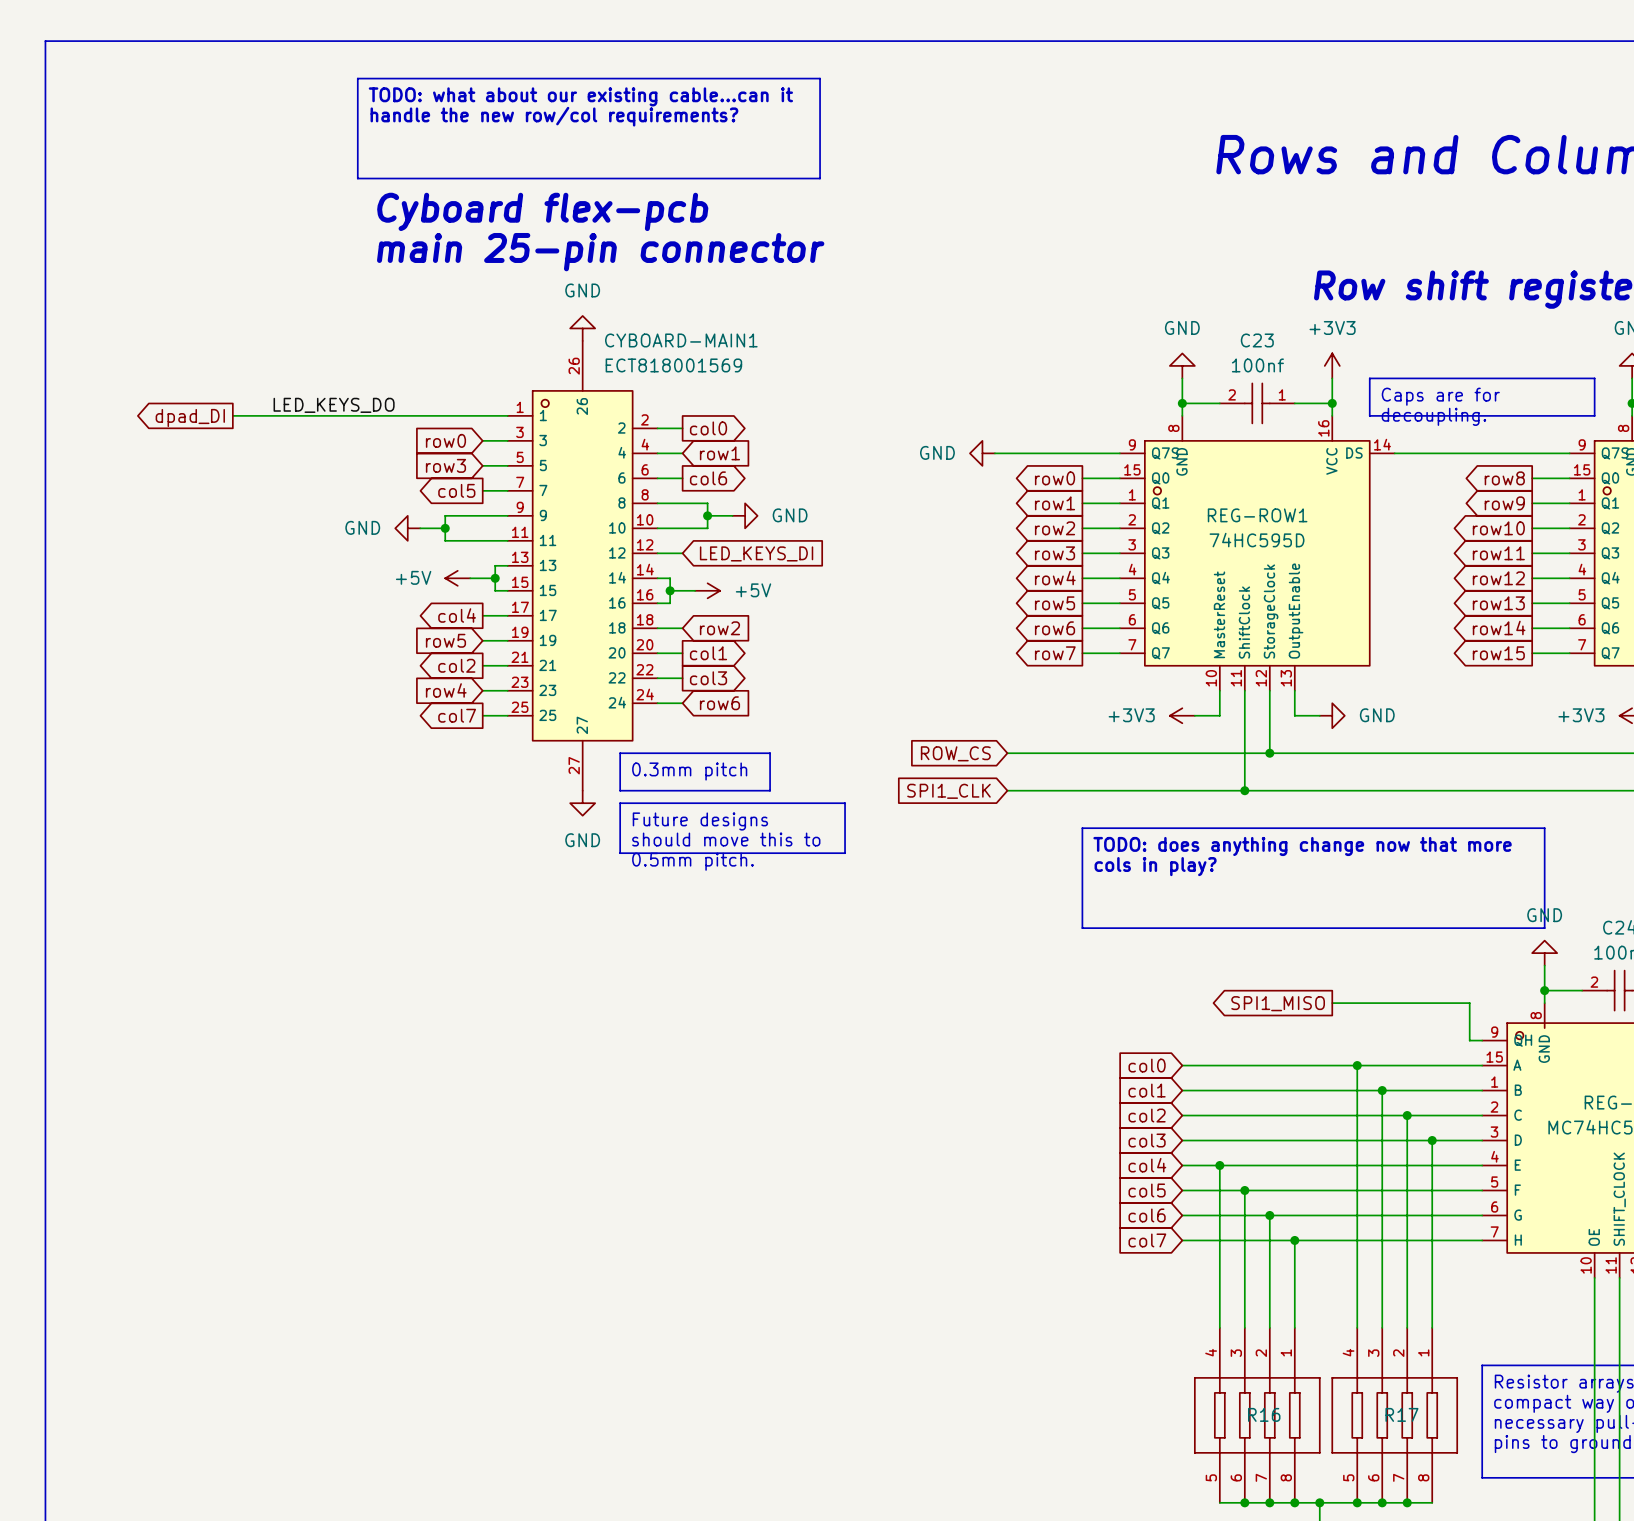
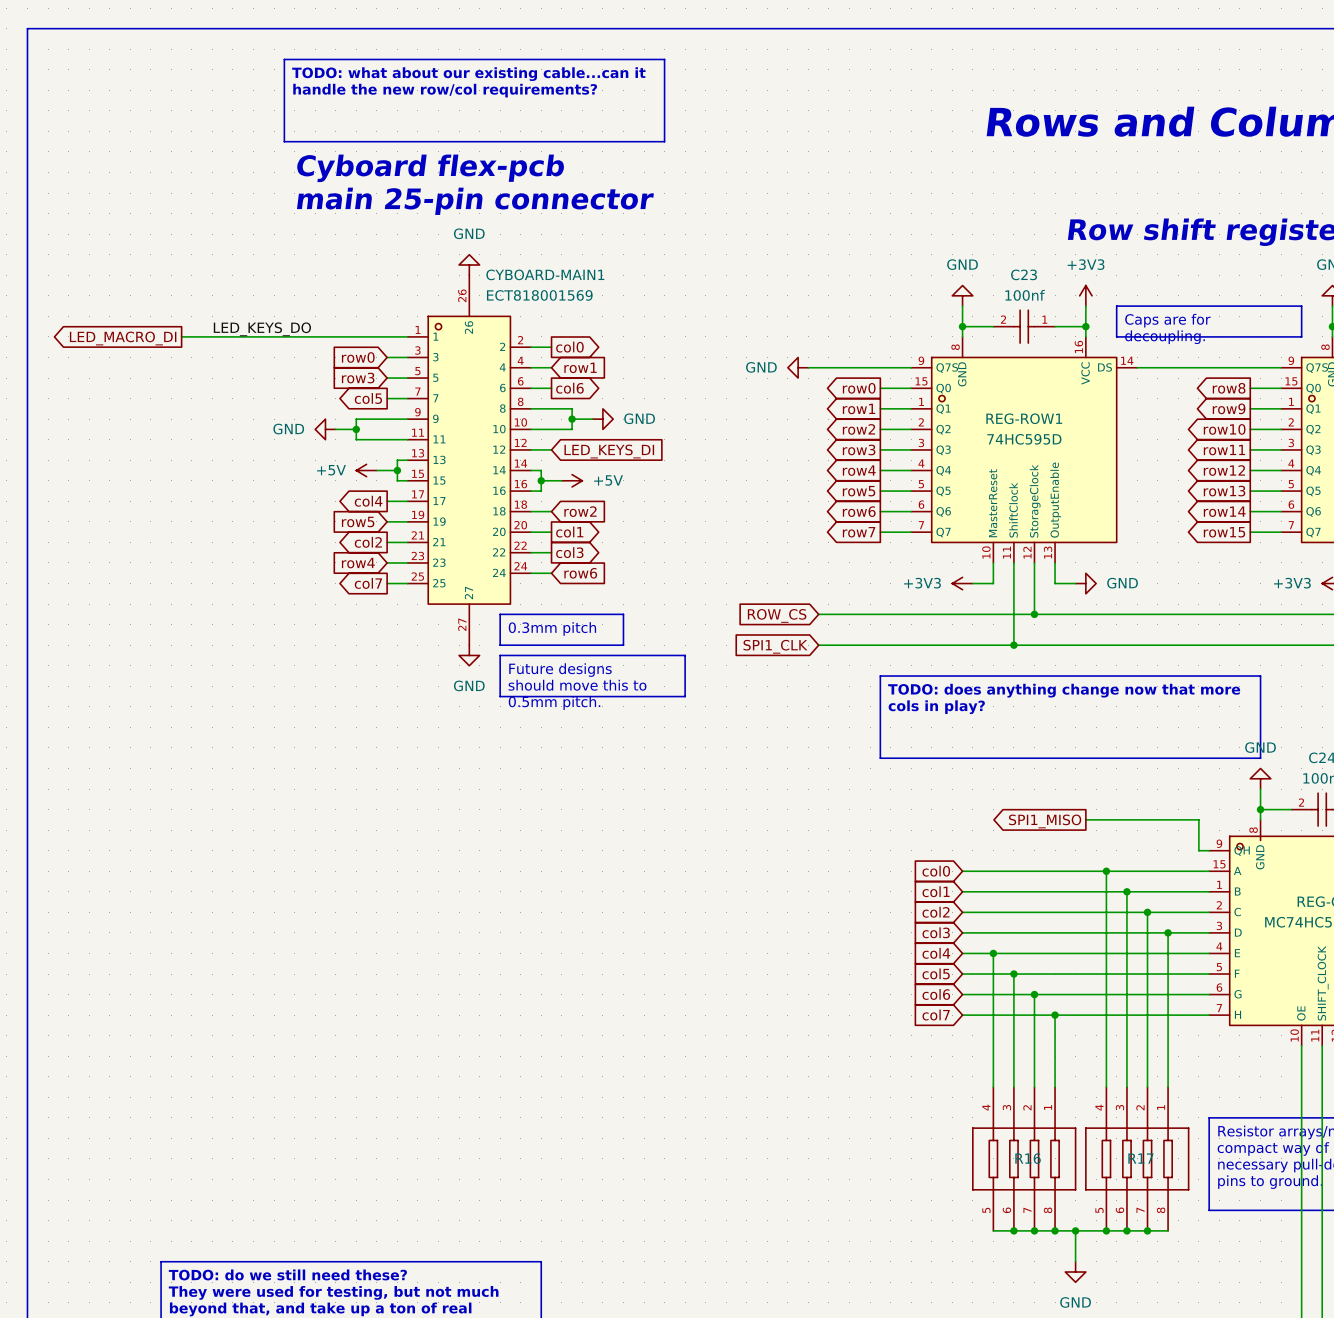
global label: dpad_DI (190, 417) -> LED_MACRO_DI (123, 338)

